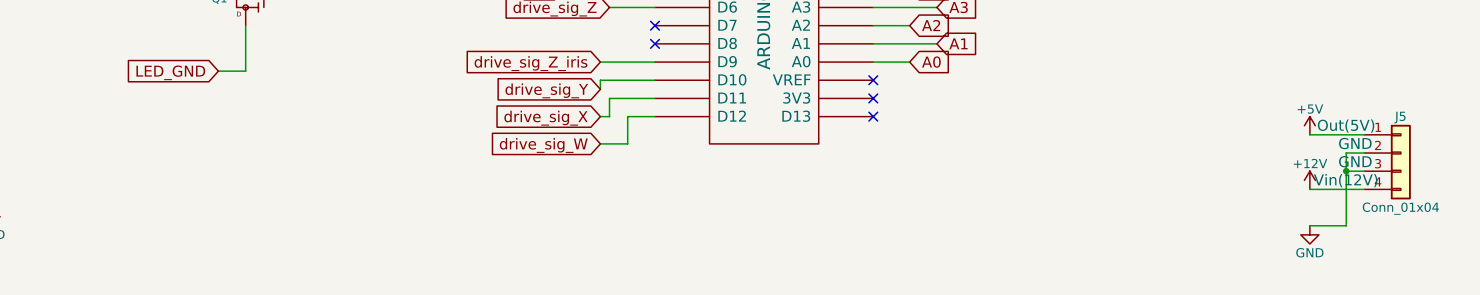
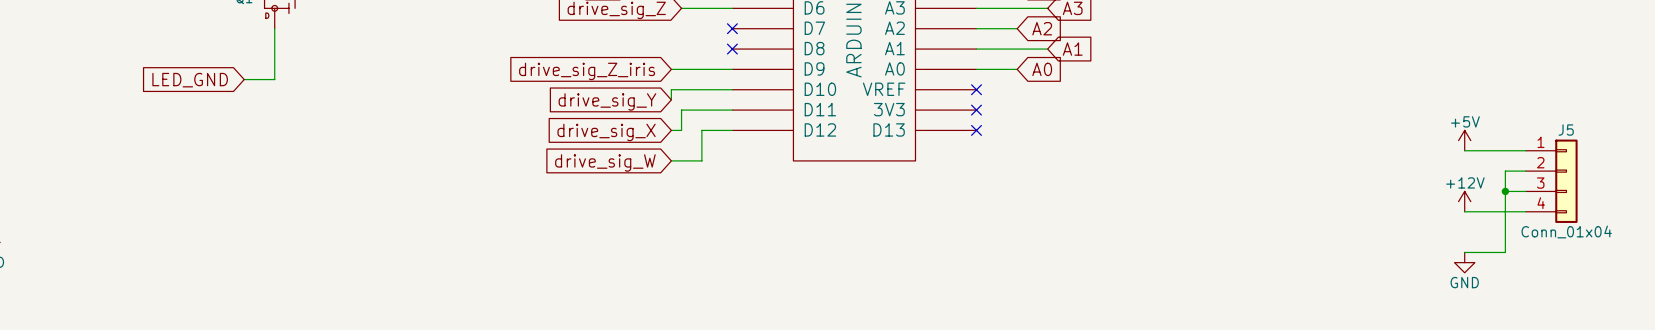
J5 text: Out(5V) (1346, 126) -> none
J5 text: GND (1355, 143) -> none
J5 text: GND (1355, 161) -> none
J5 text: Vin(12V) (1345, 180) -> none

